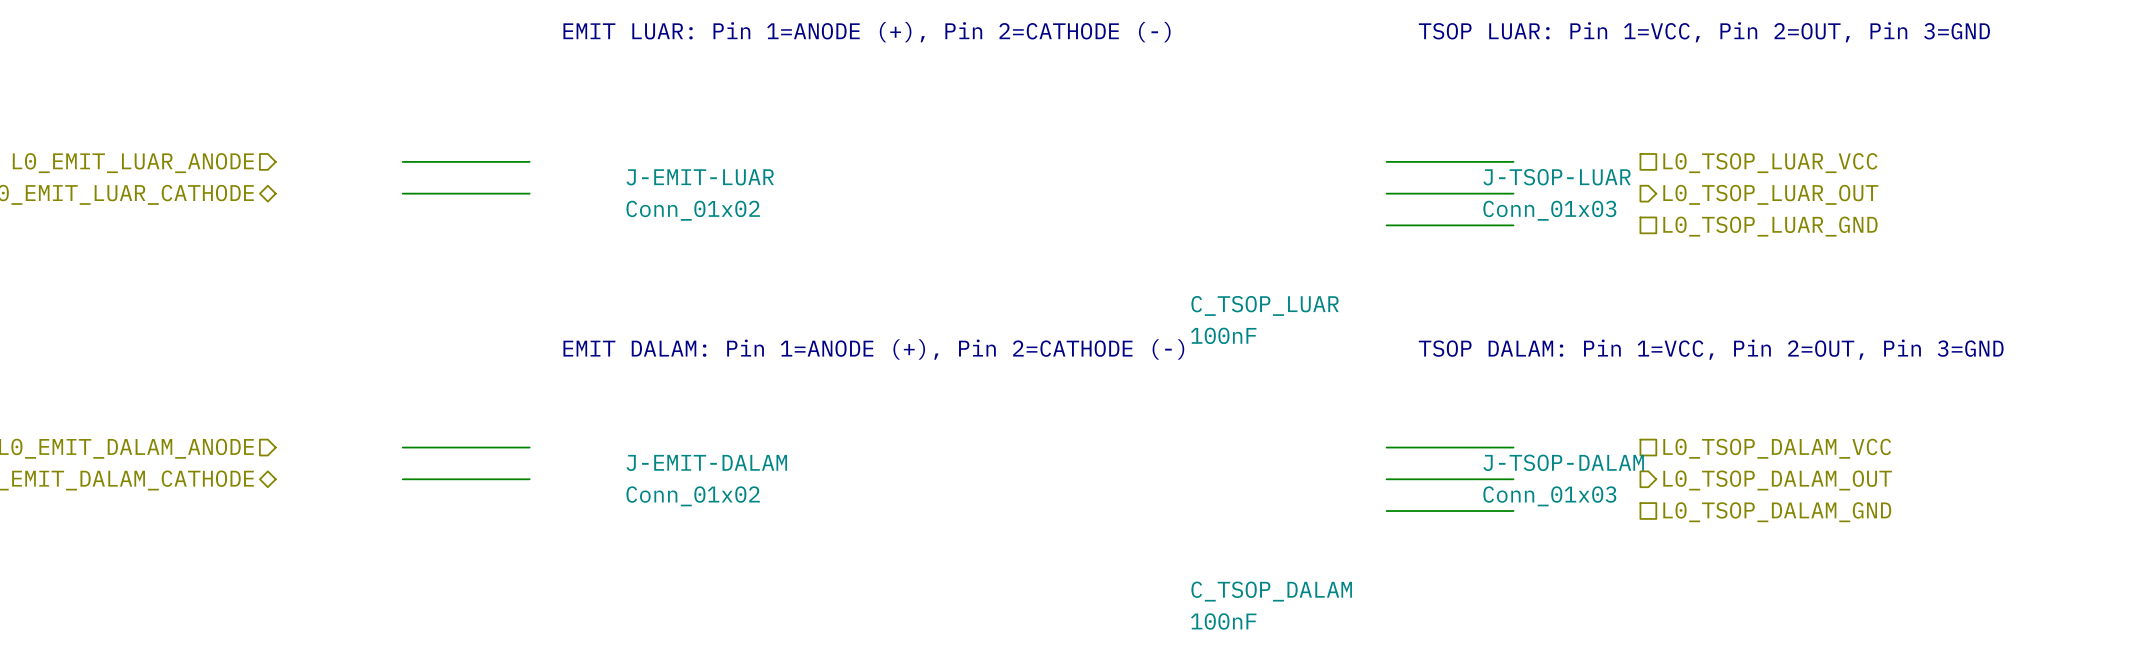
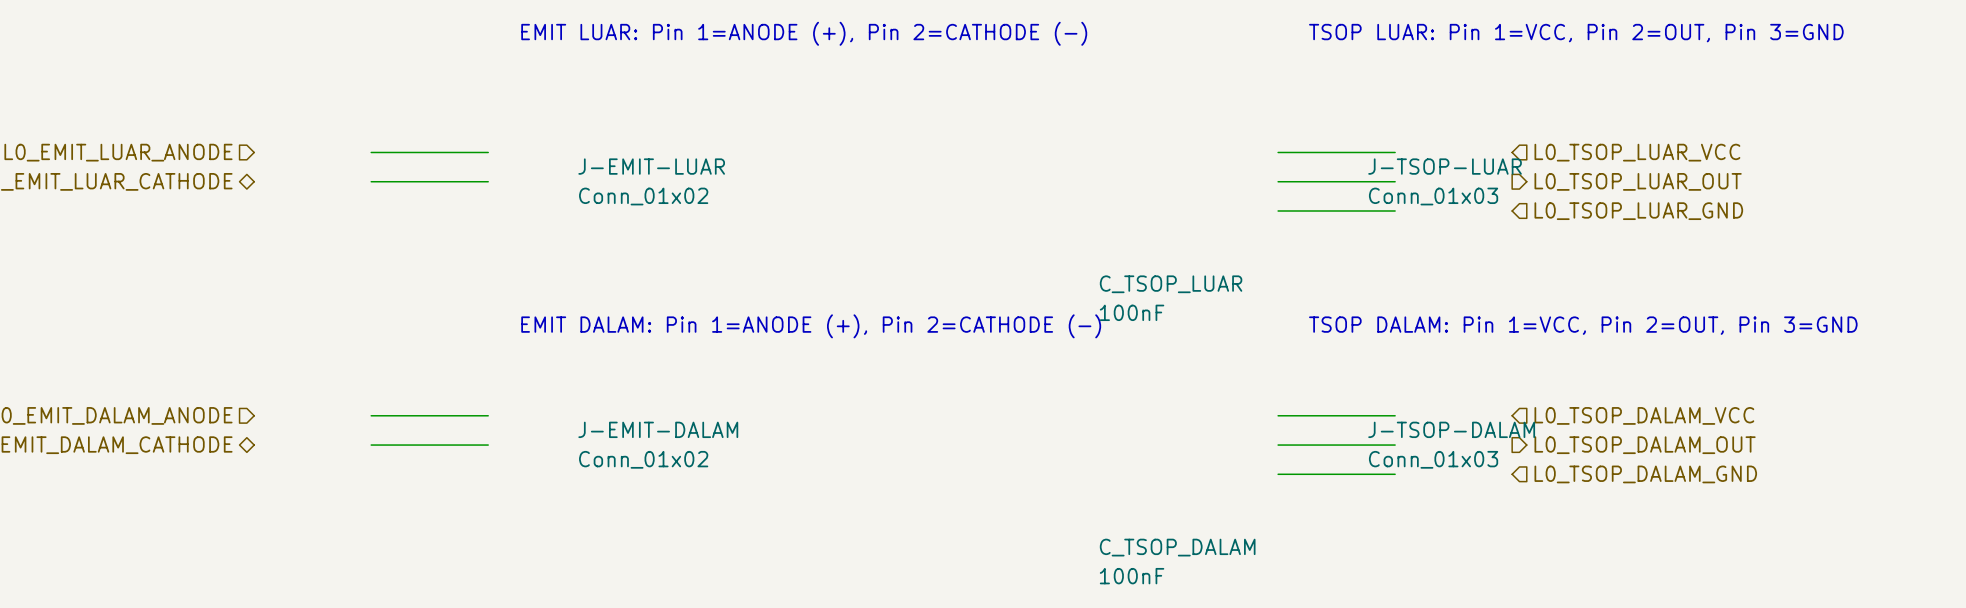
hierarchical label shape: passive (1770, 163) -> input (1637, 152)
hierarchical label shape: passive (1770, 226) -> input (1638, 211)
hierarchical label shape: passive (1777, 448) -> input (1644, 415)
hierarchical label shape: passive (1777, 512) -> input (1645, 474)

